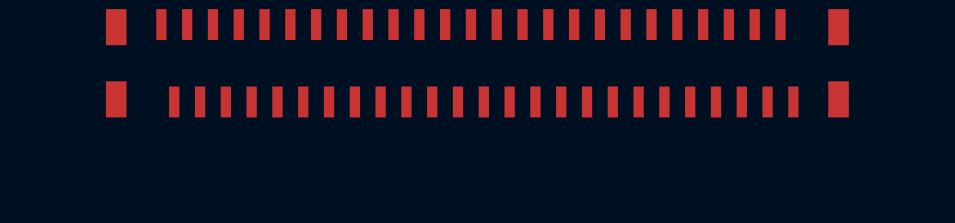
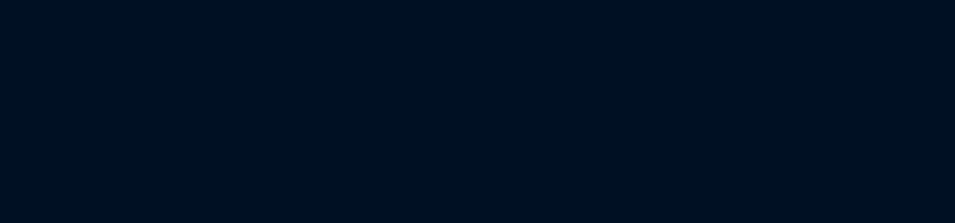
part: (477, 63) -> none

